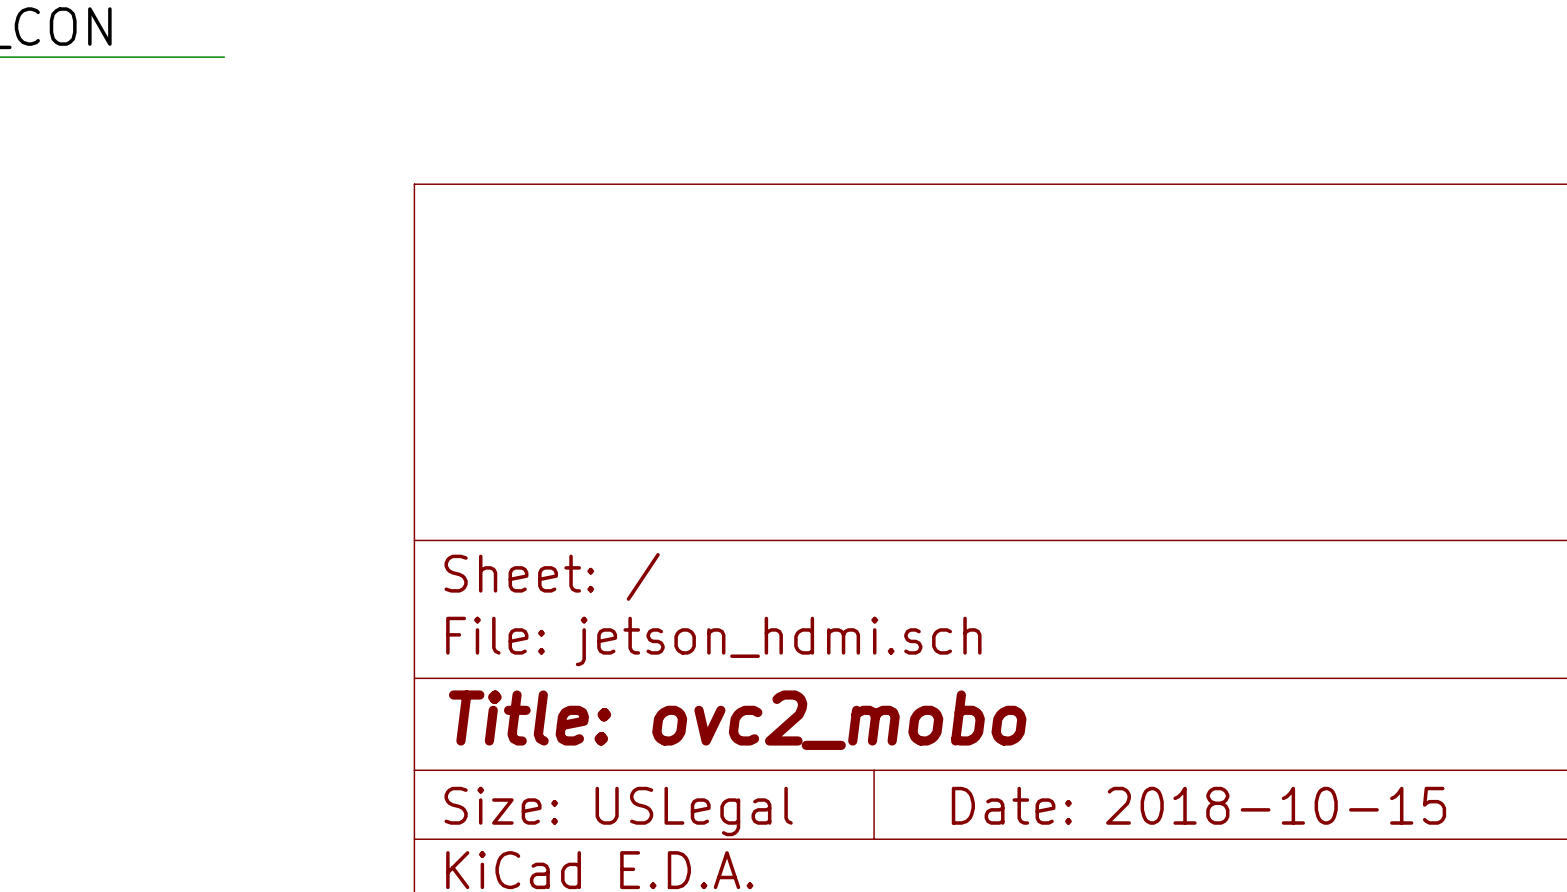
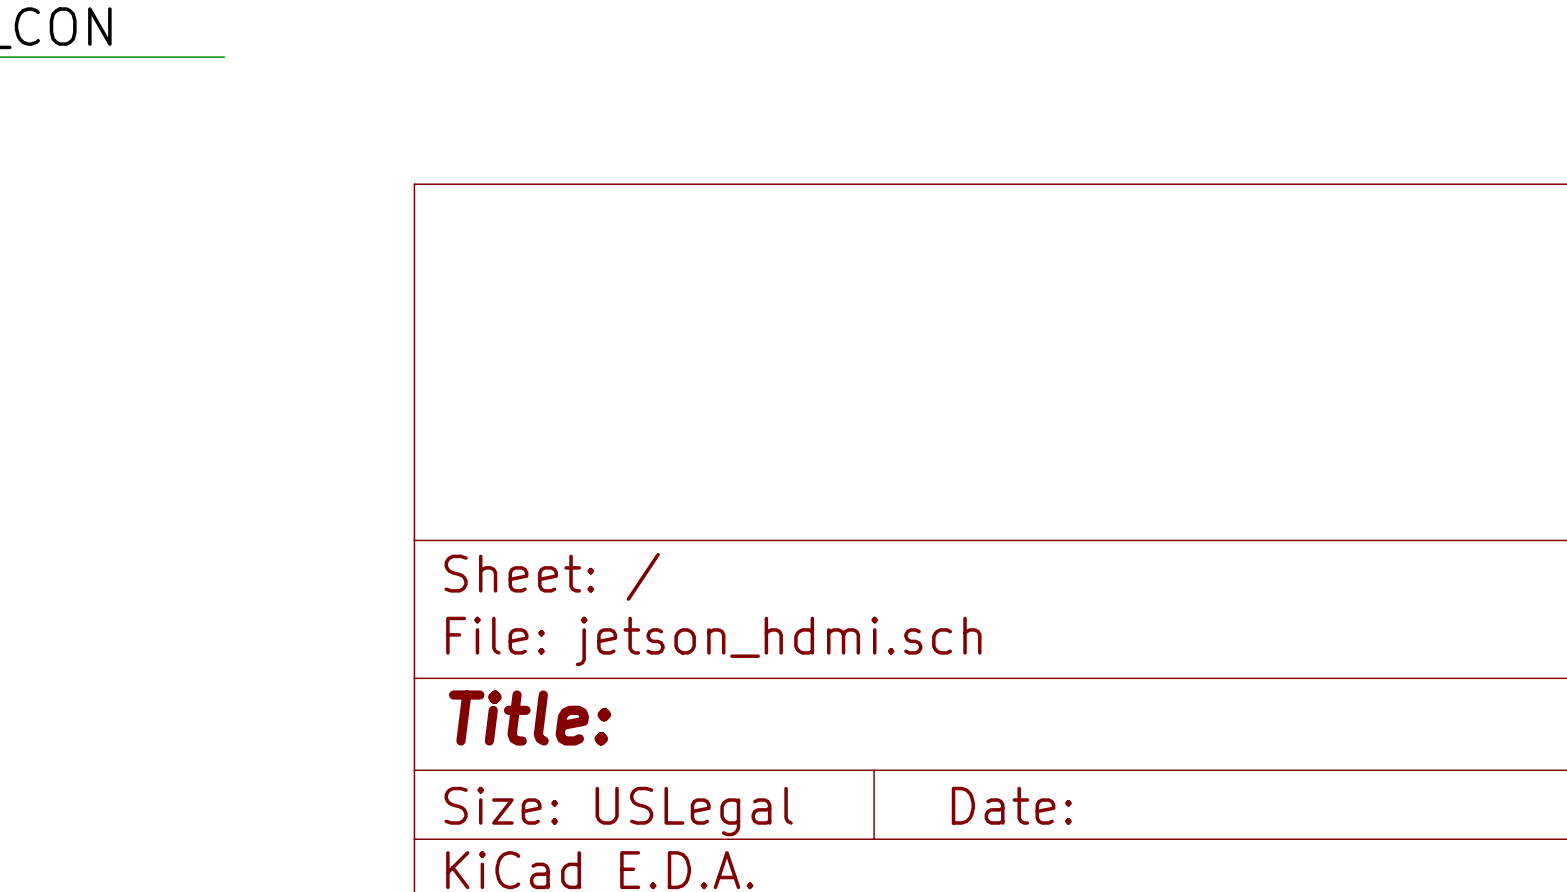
title block: Title: ovc2_mobo (737, 720) -> Title: (530, 718)
title block: Date: 2018-10-15 (1198, 805) -> Date: (1011, 805)

